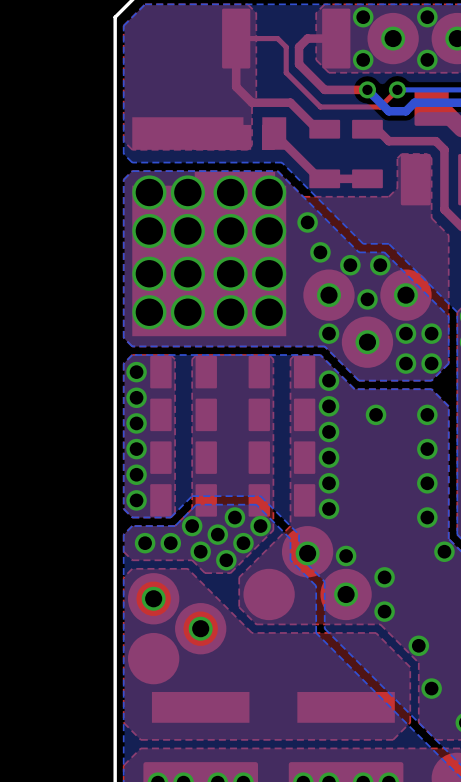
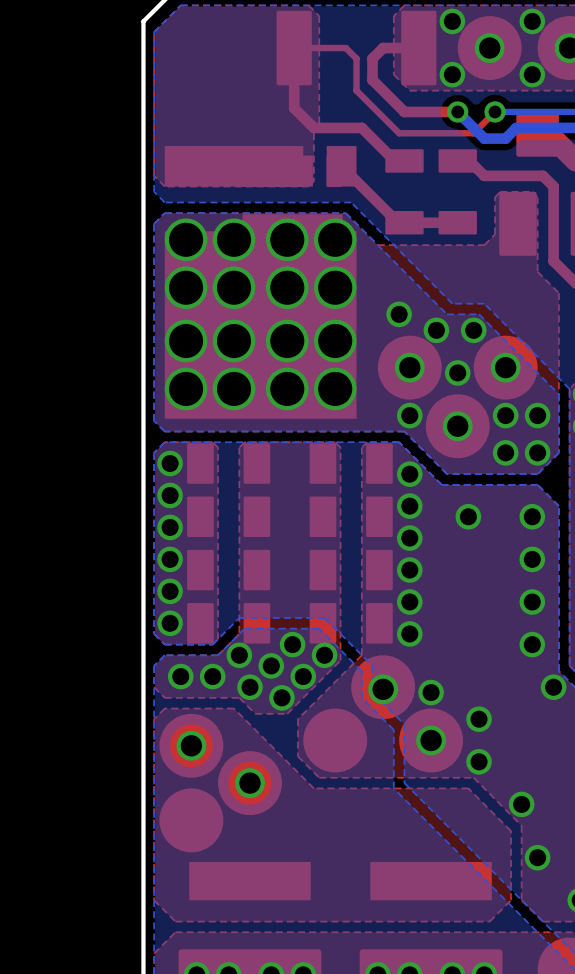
via: (307, 222) -> none

